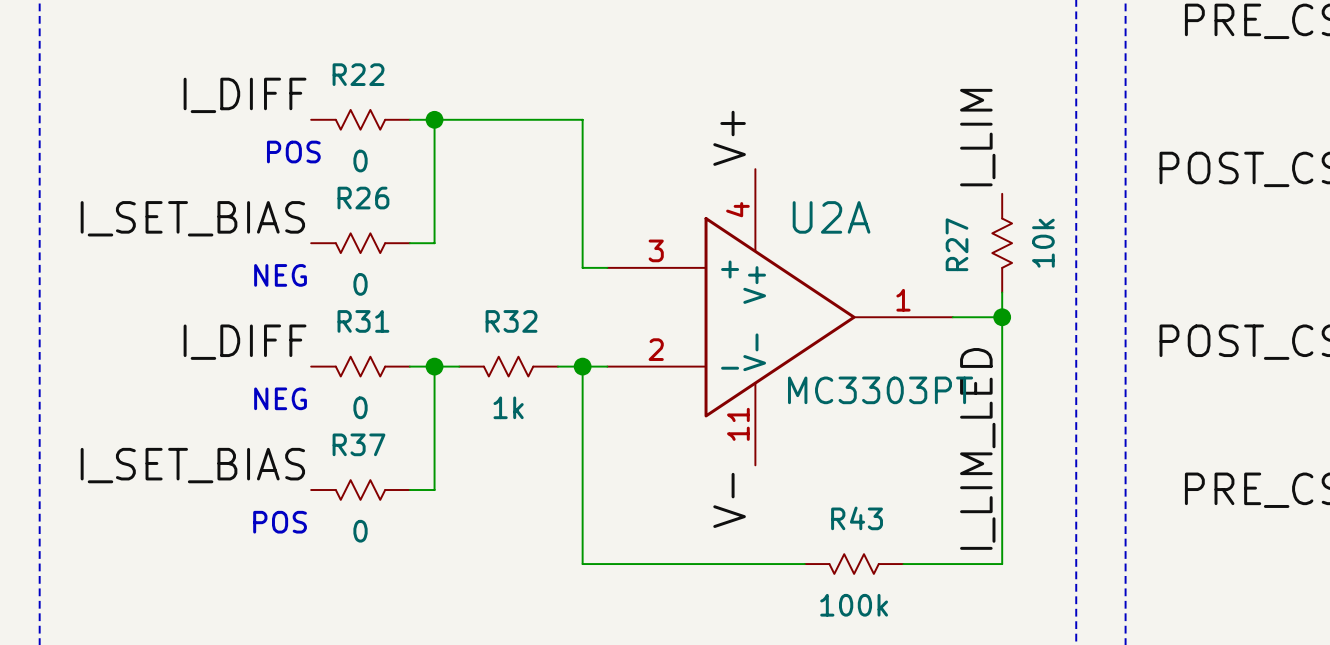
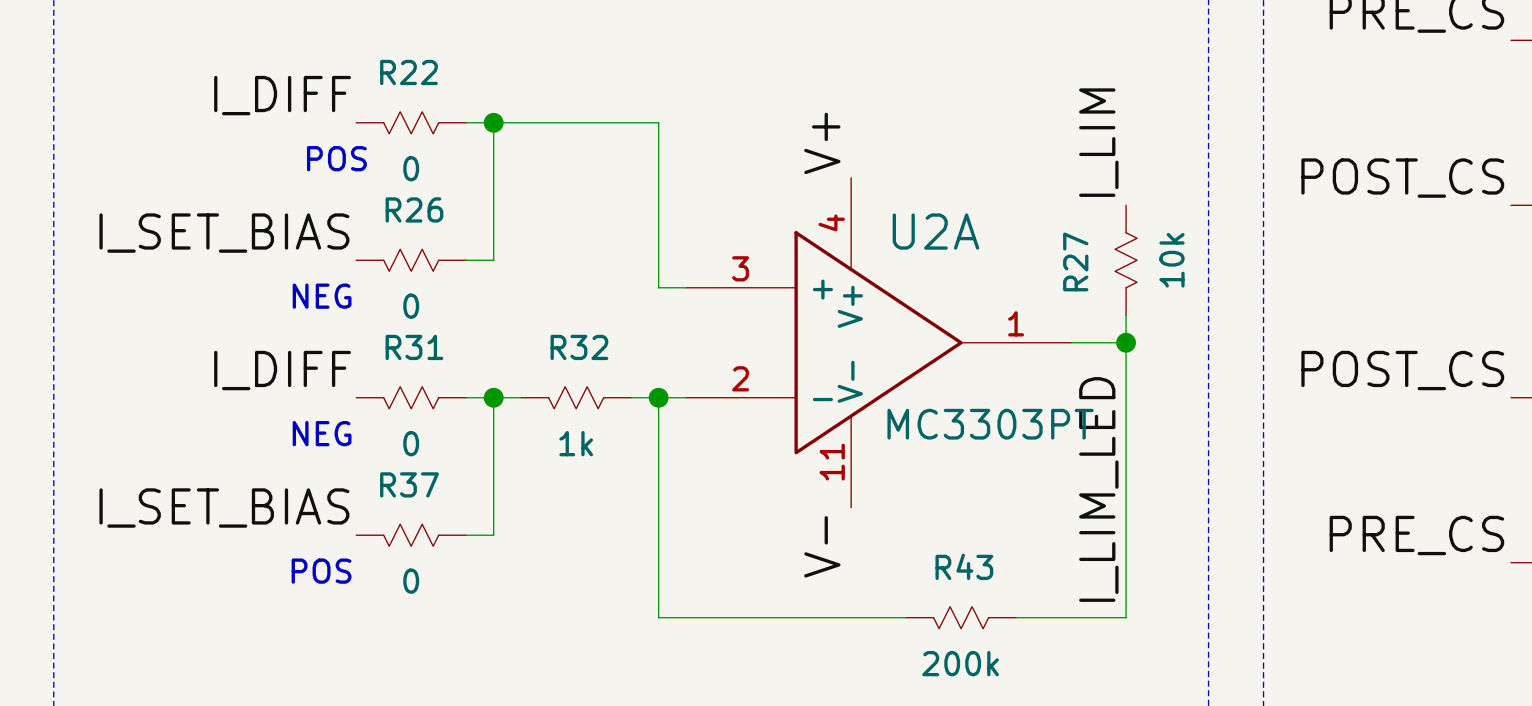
R43 value: 100k (854, 605) -> 200k (960, 663)

